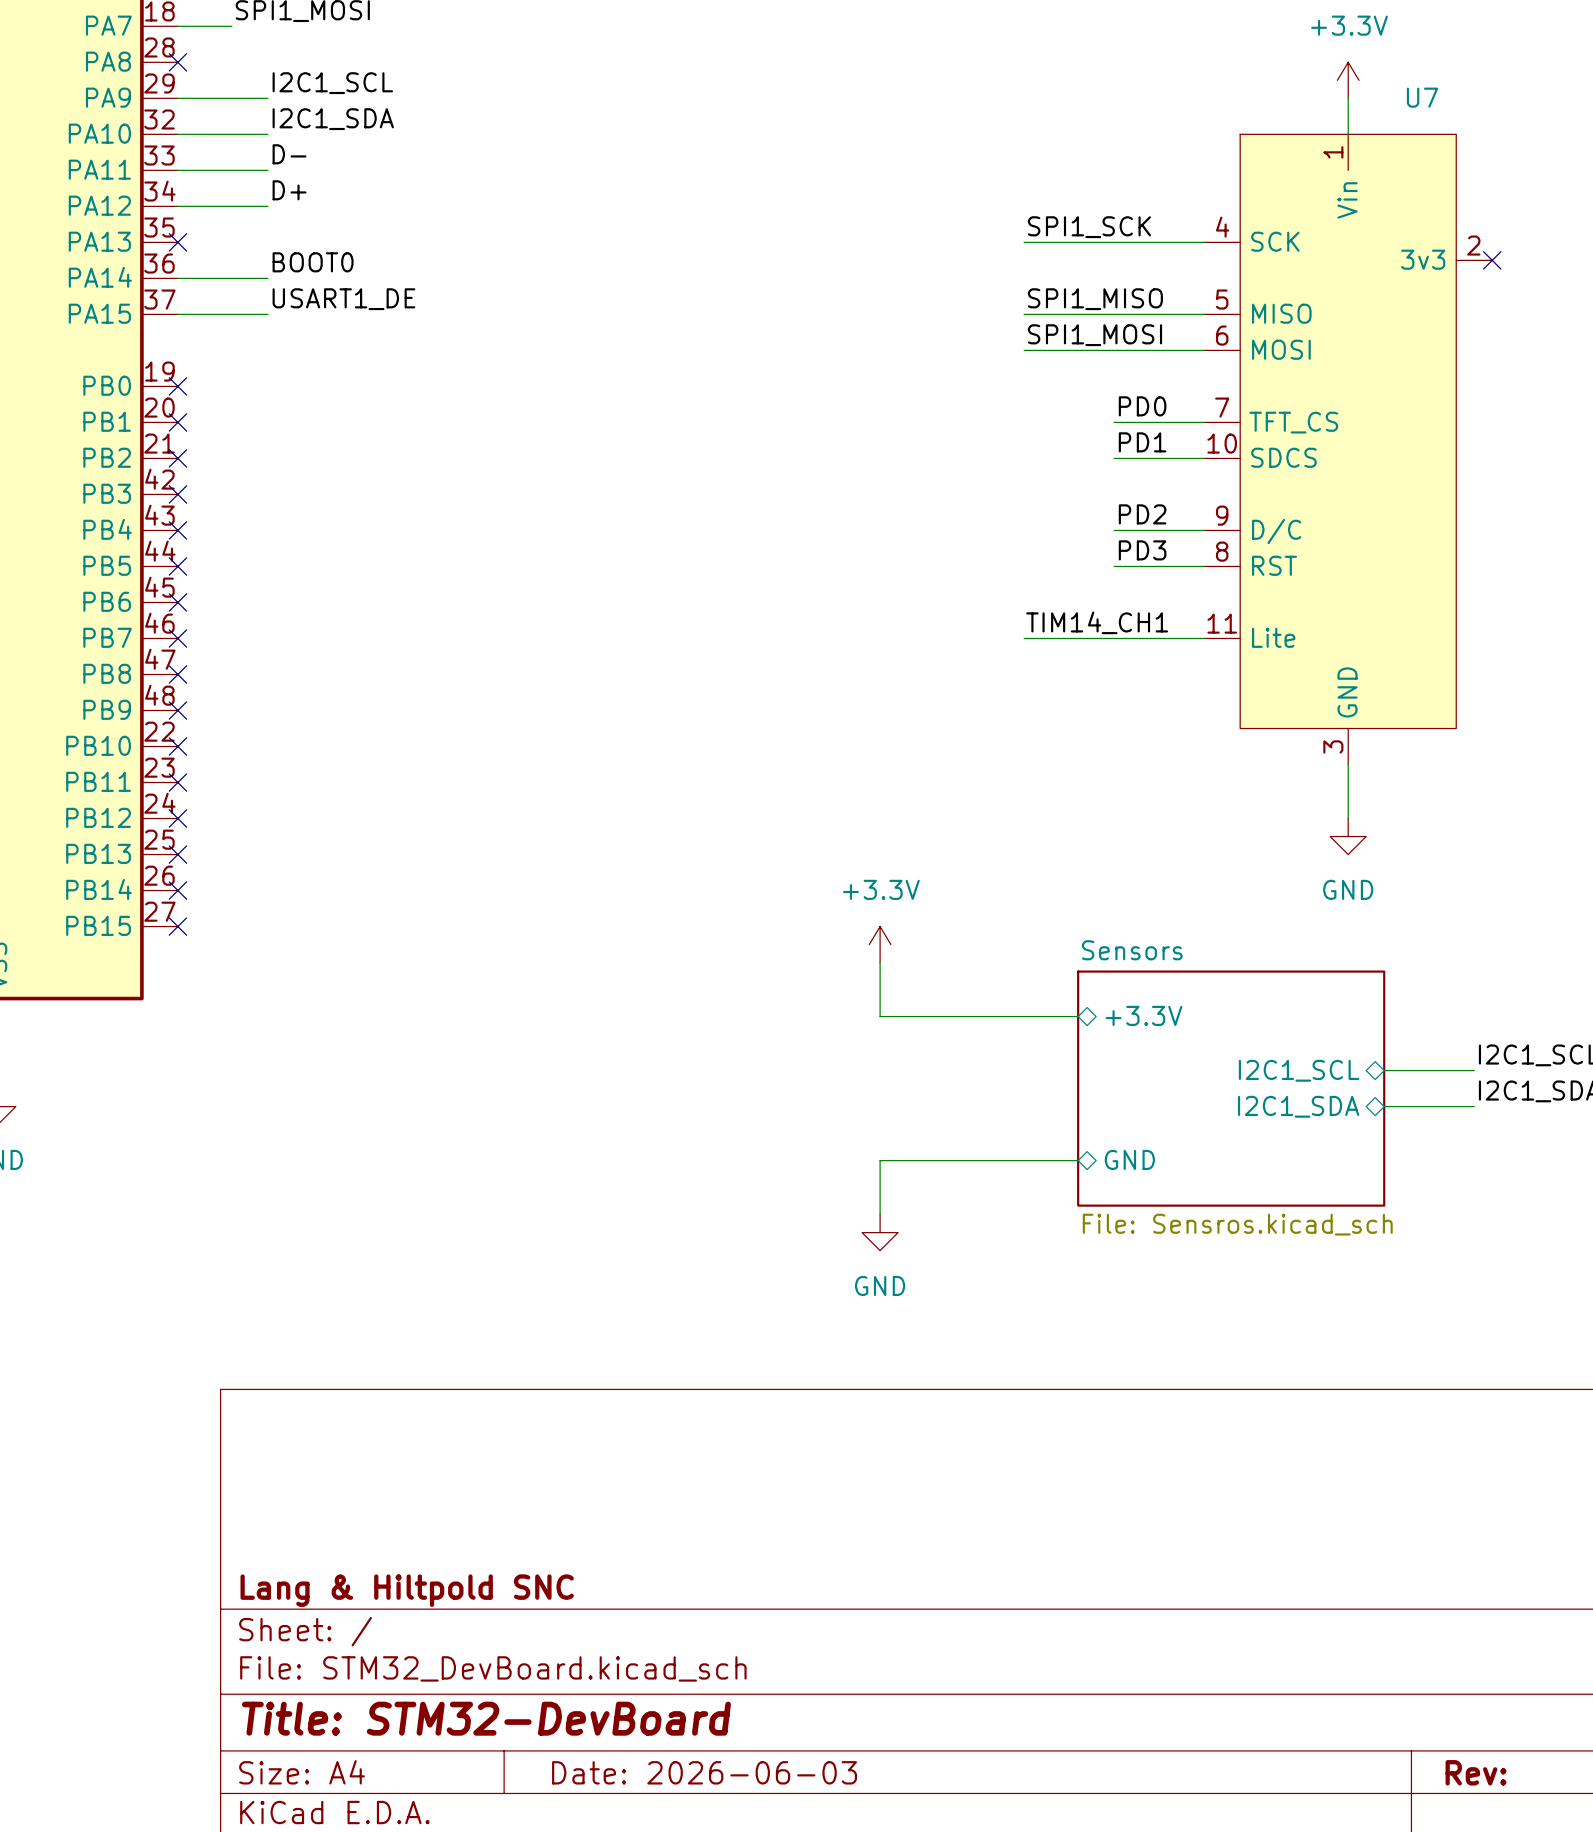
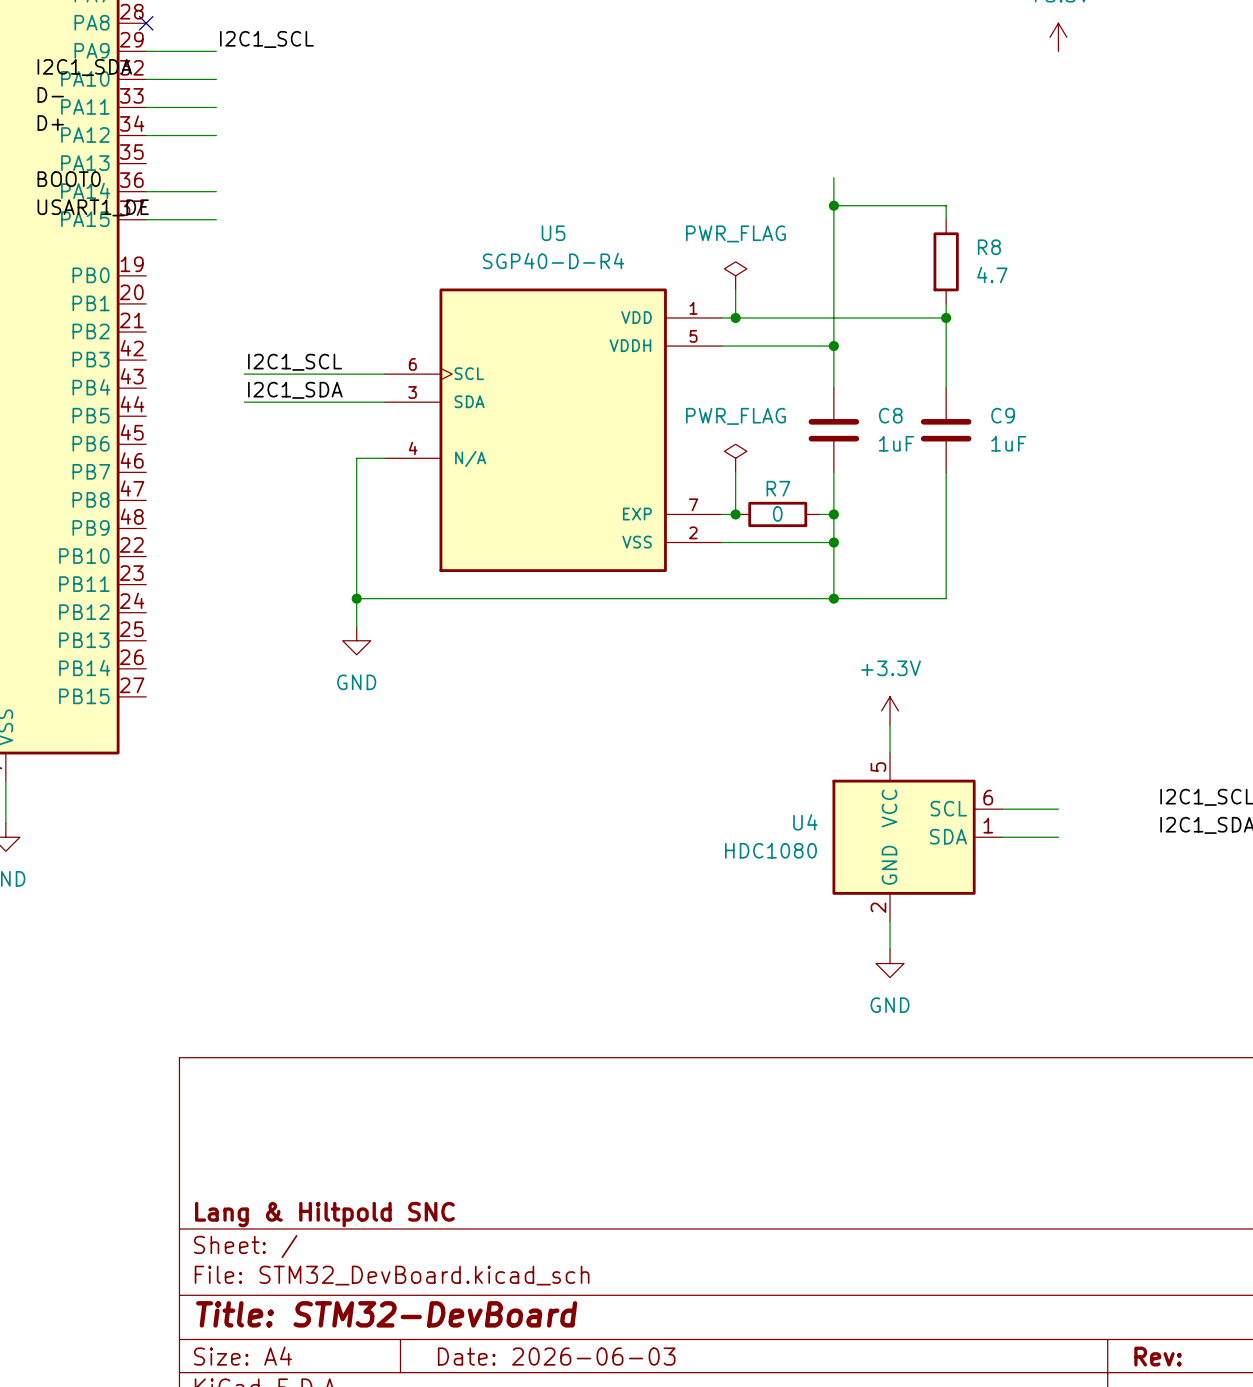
wire: (1348, 98) (1348, 134) -> none
label: none -> I2C1_SDA (84, 67)
label: I2C1_SDA (333, 119) -> none
label position: D- (289, 154) -> D- (50, 94)
label position: D+ (289, 190) -> D+ (50, 123)
label: SPI1_SCK (1089, 227) -> none
no-connect mark: (177, 242) -> none
wire: (1024, 242) (1204, 242) -> none
wire: none -> (833, 177) (833, 388)
no-connect mark: (1492, 260) -> none
label position: BOOT0 (313, 262) -> BOOT0 (69, 179)
junction: none -> (833, 205)
label position: USART1_DE (343, 299) -> USART1_DE (93, 207)
label: SPI1_MISO (1095, 299) -> none
wire: (1024, 314) (1204, 314) -> (833, 205) (946, 205) (946, 219)
label: SPI1_MOSI (1095, 335) -> none
wire: (1024, 350) (1204, 350) -> none
R8: none -> 4.7 (946, 261)
no-connect mark: (177, 386) -> none
power symbol: none -> PWR_FLAG (735, 275)
wire: none -> (735, 289) (735, 317)
label: PD0 (1142, 406) -> none
no-connect mark: (177, 422) -> none
wire: (1114, 422) (1204, 422) -> (946, 388) (946, 303)
wire: none -> (721, 317) (946, 317)
junction: none -> (735, 317)
junction: none -> (946, 317)
label: PD1 (1142, 442) -> none
U7: (1348, 449) -> none
no-connect mark: (177, 458) -> none
wire: (1114, 458) (1204, 458) -> none
wire: none -> (721, 346) (833, 346)
junction: none -> (833, 346)
no-connect mark: (177, 494) -> none
label: none -> I2C1_SCL (295, 362)
wire: none -> (244, 374) (384, 374)
label: PD2 (1142, 514) -> none
no-connect mark: (177, 530) -> none
wire: (1114, 530) (1204, 530) -> none
label: none -> I2C1_SDA (295, 390)
wire: none -> (244, 402) (384, 402)
label: PD3 (1142, 550) -> none
no-connect mark: (177, 566) -> none
wire: (1114, 566) (1204, 566) -> none
U5: none -> SGP40-D-R4 (553, 430)
C8: none -> 1uF (833, 430)
C9: none -> 1uF (946, 430)
no-connect mark: (177, 602) -> none
wire: none -> (384, 458) (356, 458) (356, 626)
power symbol: none -> PWR_FLAG (735, 458)
label: TIM14_CH1 (1097, 622) -> none
no-connect mark: (177, 638) -> none
wire: none -> (735, 472) (735, 514) (721, 514)
wire: (1024, 638) (1204, 638) -> (356, 598) (946, 598) (946, 472)
wire: none -> (833, 472) (833, 598)
no-connect mark: (177, 674) -> none
junction: none -> (735, 514)
R7: none -> 0 (777, 514)
wire: none -> (819, 514) (833, 514)
junction: none -> (833, 514)
no-connect mark: (177, 710) -> none
wire: none -> (721, 542) (833, 542)
junction: none -> (833, 542)
no-connect mark: (177, 746) -> none
wire: (1348, 764) (1348, 818) -> none
no-connect mark: (177, 782) -> none
junction: none -> (356, 598)
junction: none -> (833, 598)
no-connect mark: (177, 818) -> none
power symbol: GND (1348, 836) -> none
no-connect mark: (177, 854) -> none
power symbol: none -> GND (356, 640)
no-connect mark: (177, 890) -> none
no-connect mark: (177, 926) -> none
power symbol position: +3.3V (880, 944) -> +3.3V (890, 710)
wire: (880, 962) (880, 1016) (1078, 1016) -> none
wire: none -> (890, 724) (890, 753)
sheet pin: +3.3V (1144, 1015) -> none
wire: none -> (1002, 809) (1058, 809)
sheet pin: I2C1_SCL (1299, 1070) -> none
wire: (1384, 1070) (1474, 1070) -> none
sheet Sensors: File: Sensros.kicad_sch (1231, 1088) -> none
U4: none -> HDC1080 (917, 837)
wire: none -> (1002, 837) (1058, 837)
sheet pin: I2C1_SDA (1298, 1106) -> none
wire: (1384, 1106) (1474, 1106) -> none
sheet pin: GND (1129, 1159) -> none
wire: (1078, 1160) (880, 1160) (880, 1214) -> none
wire: none -> (890, 921) (890, 949)
power symbol: GND (880, 1232) -> none
power symbol: none -> GND (890, 963)

